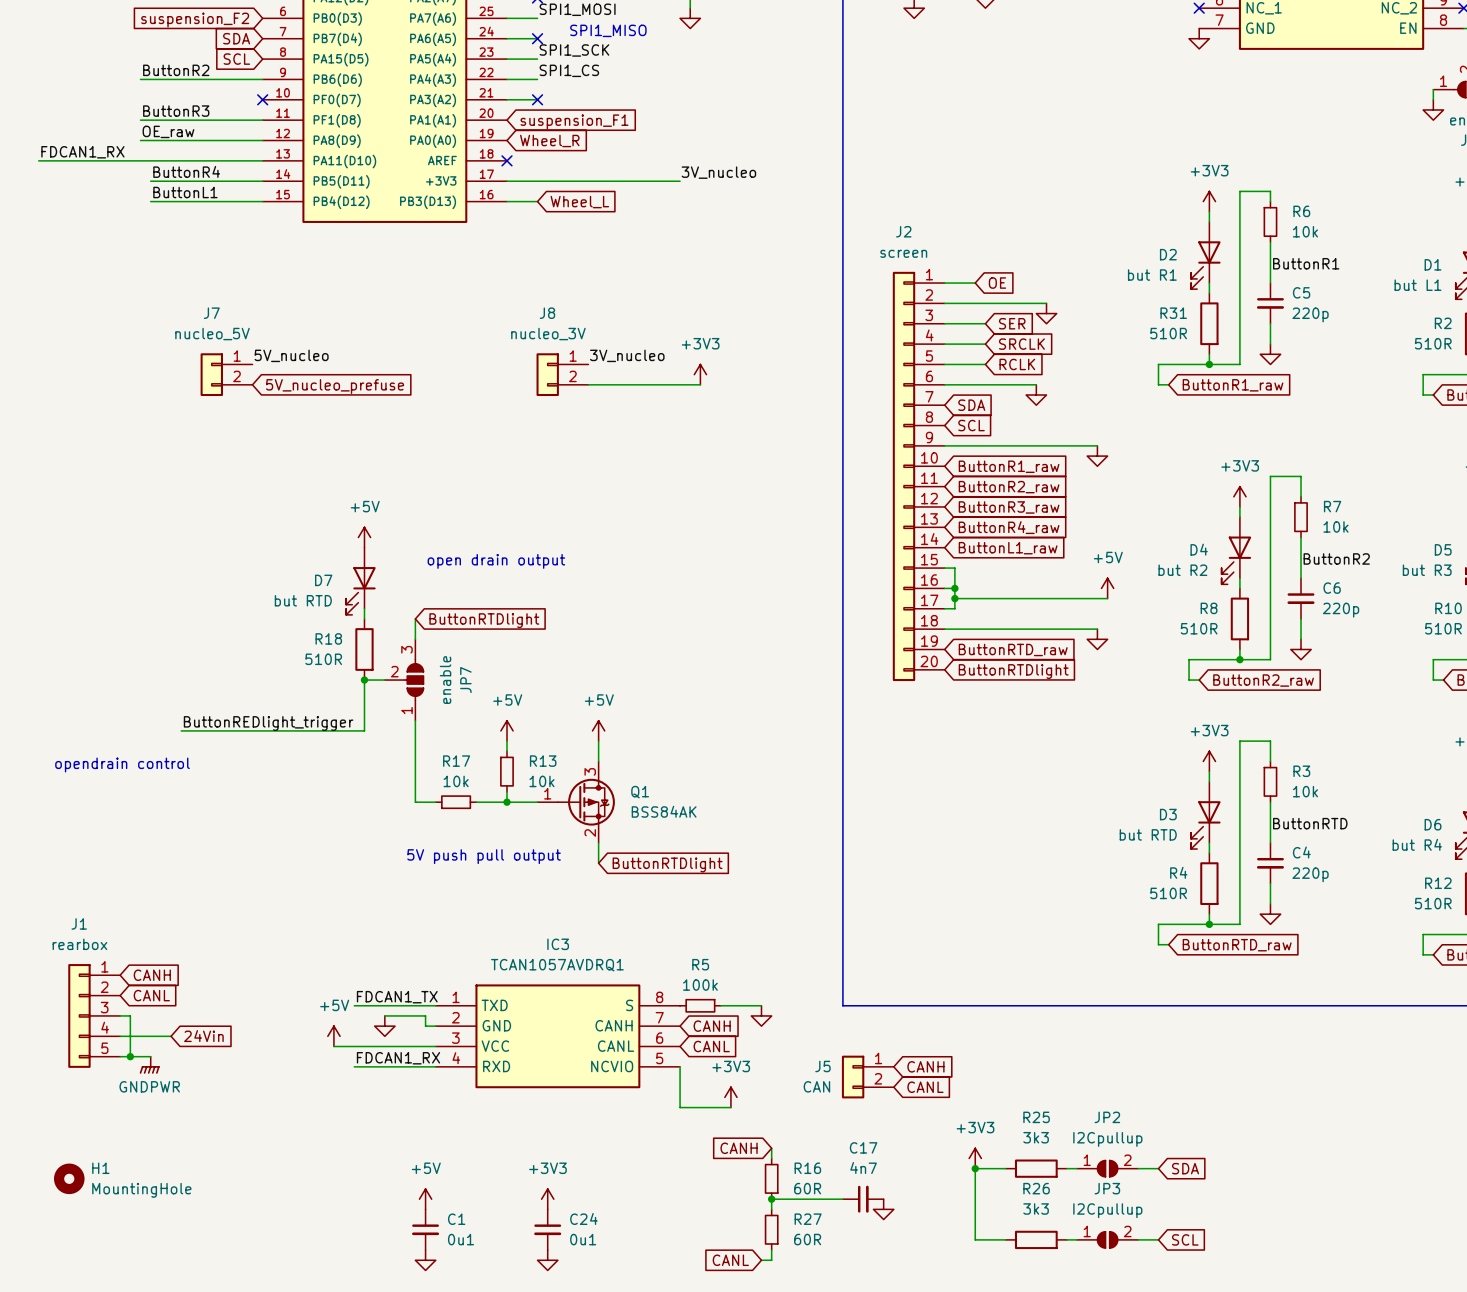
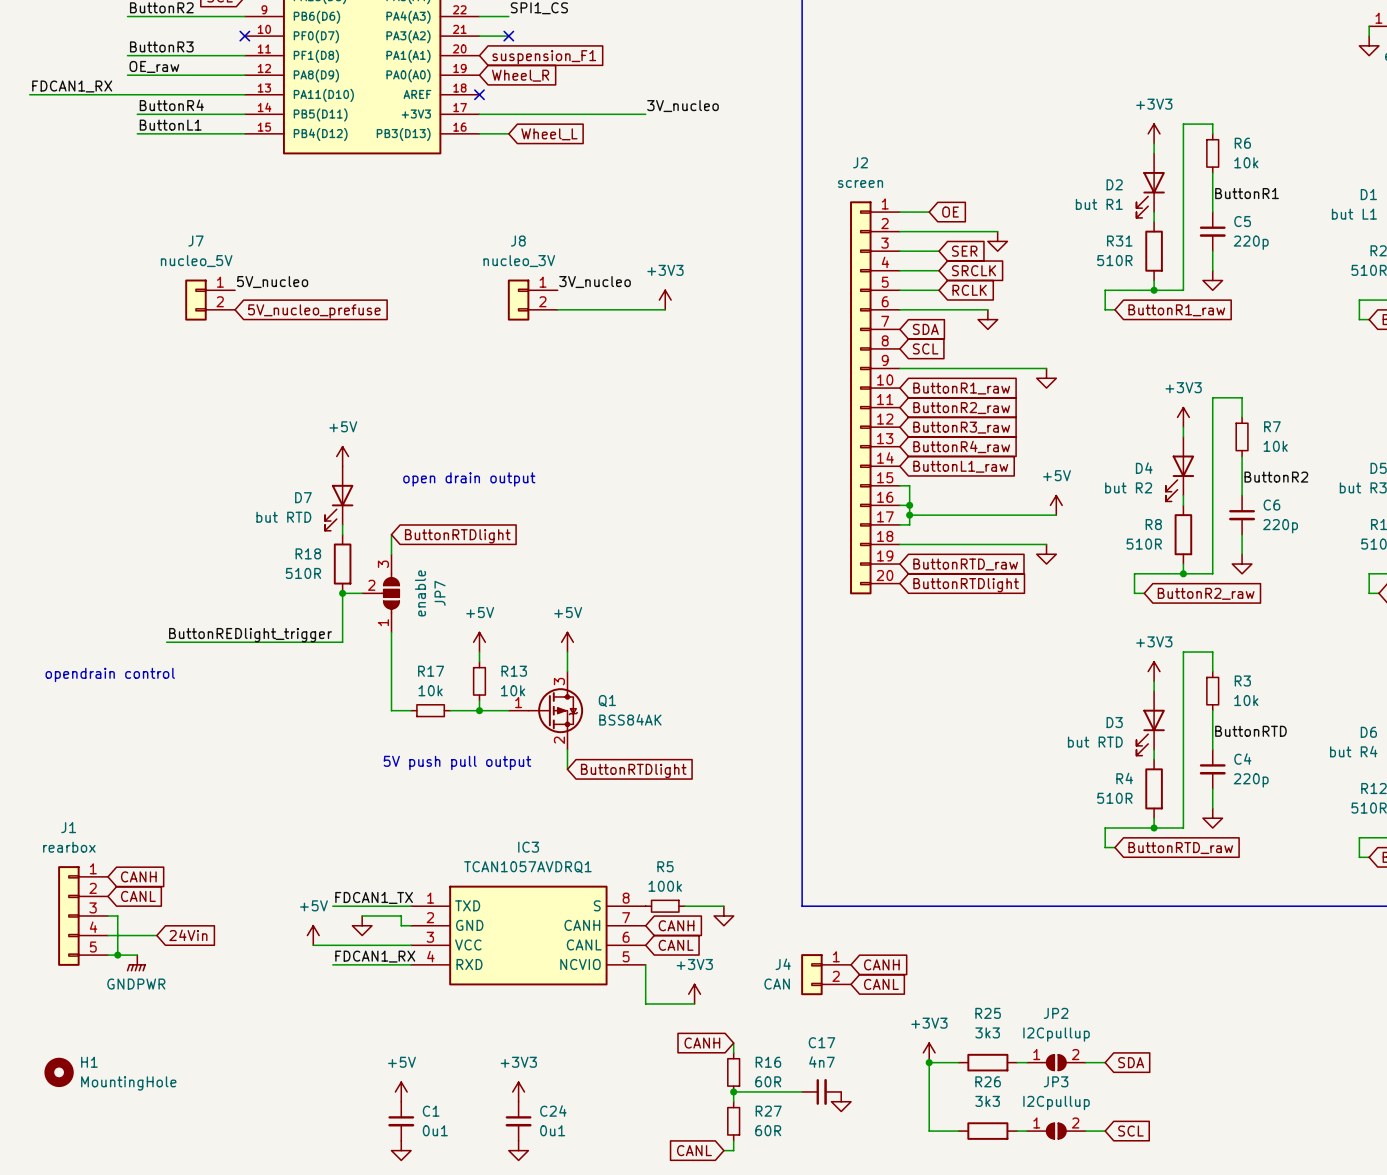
J5 name: J5 (822, 1066) -> J4 (783, 964)

